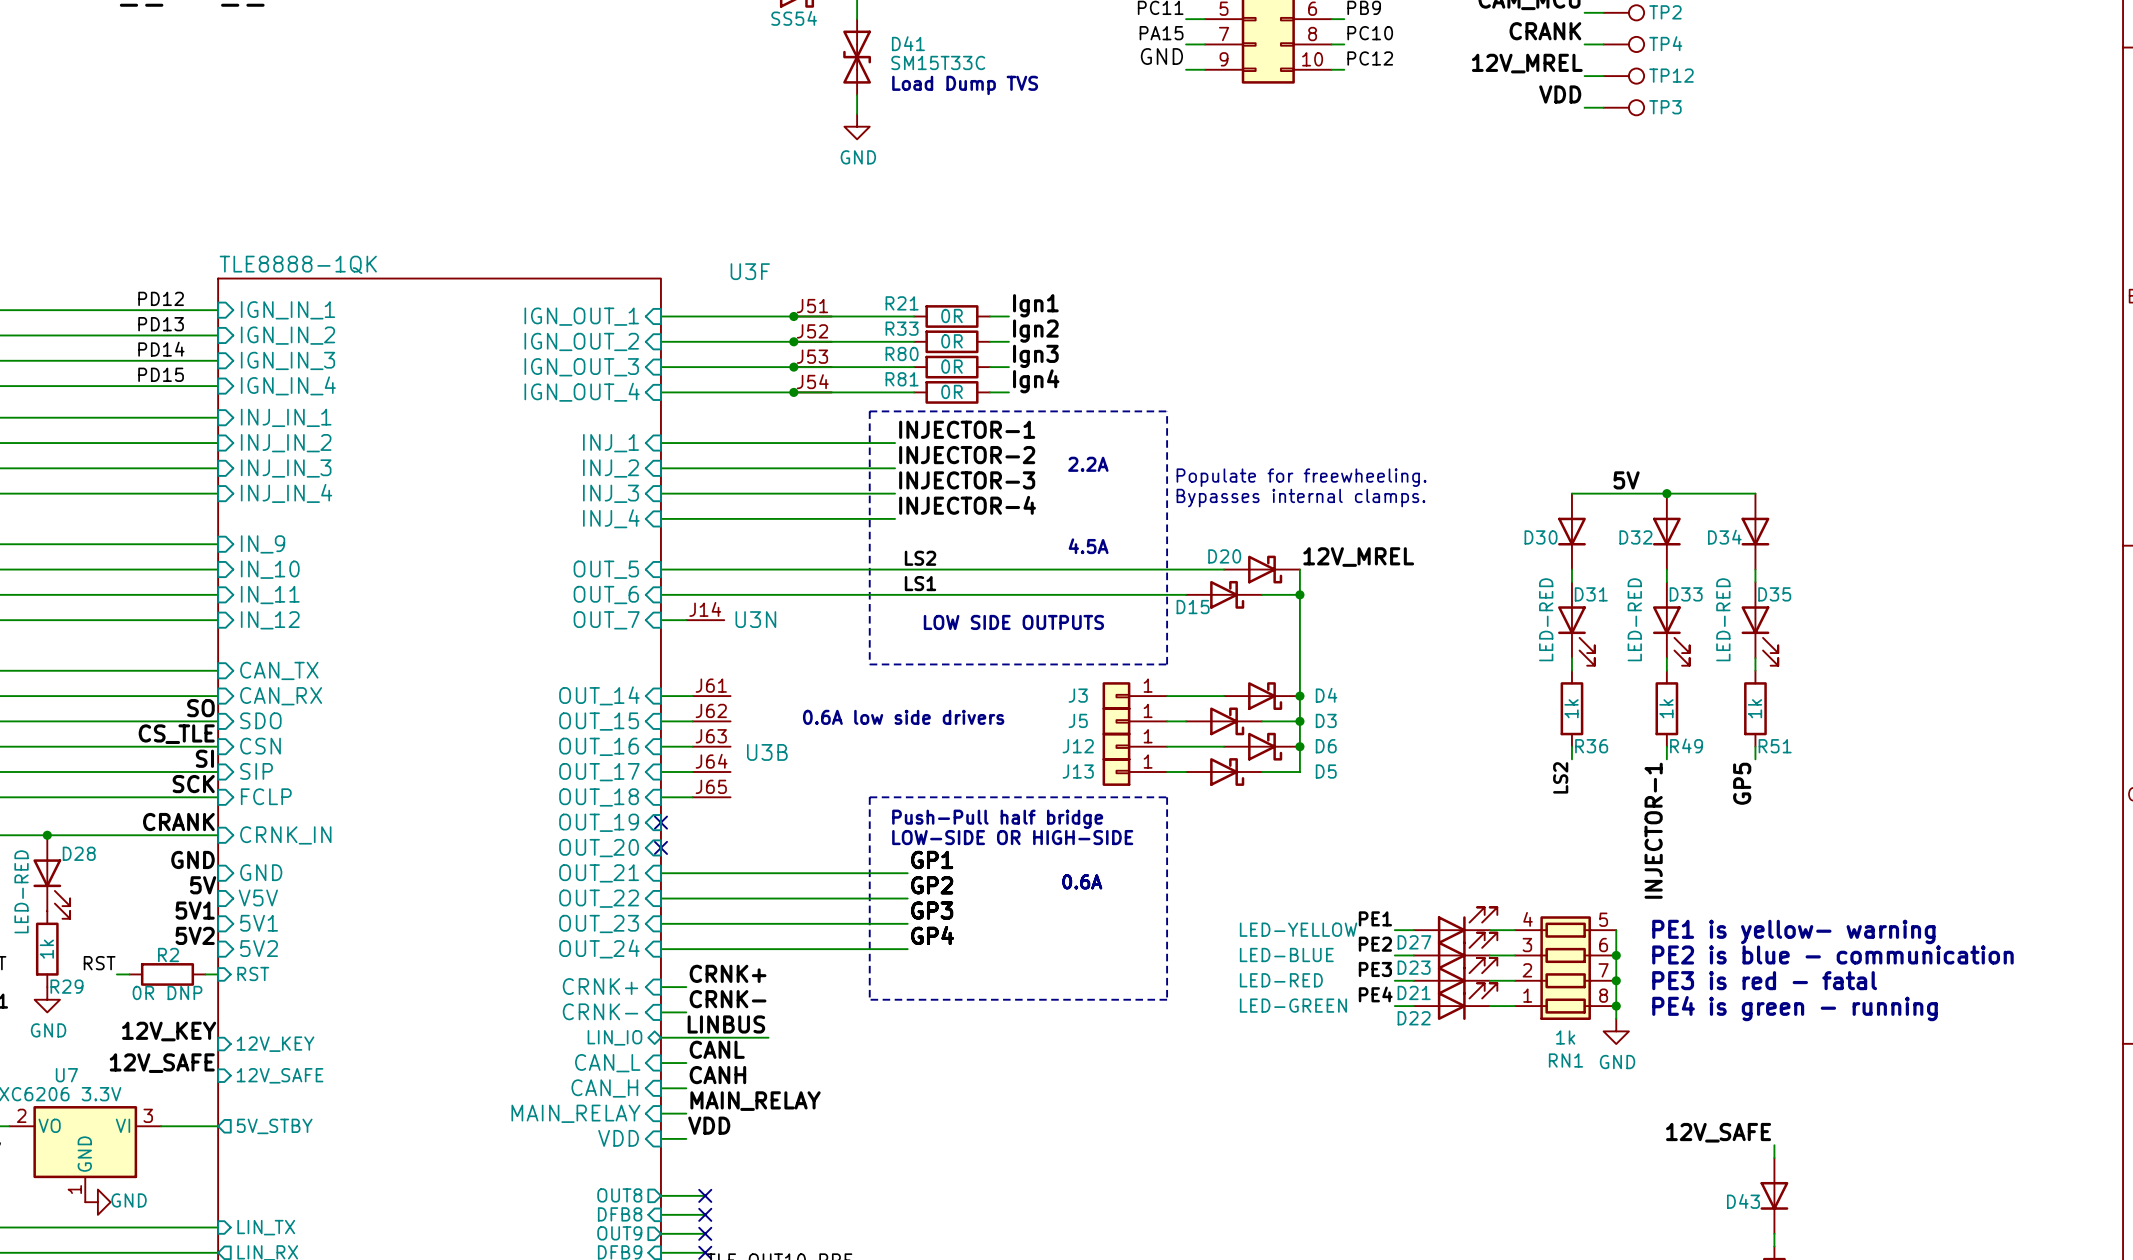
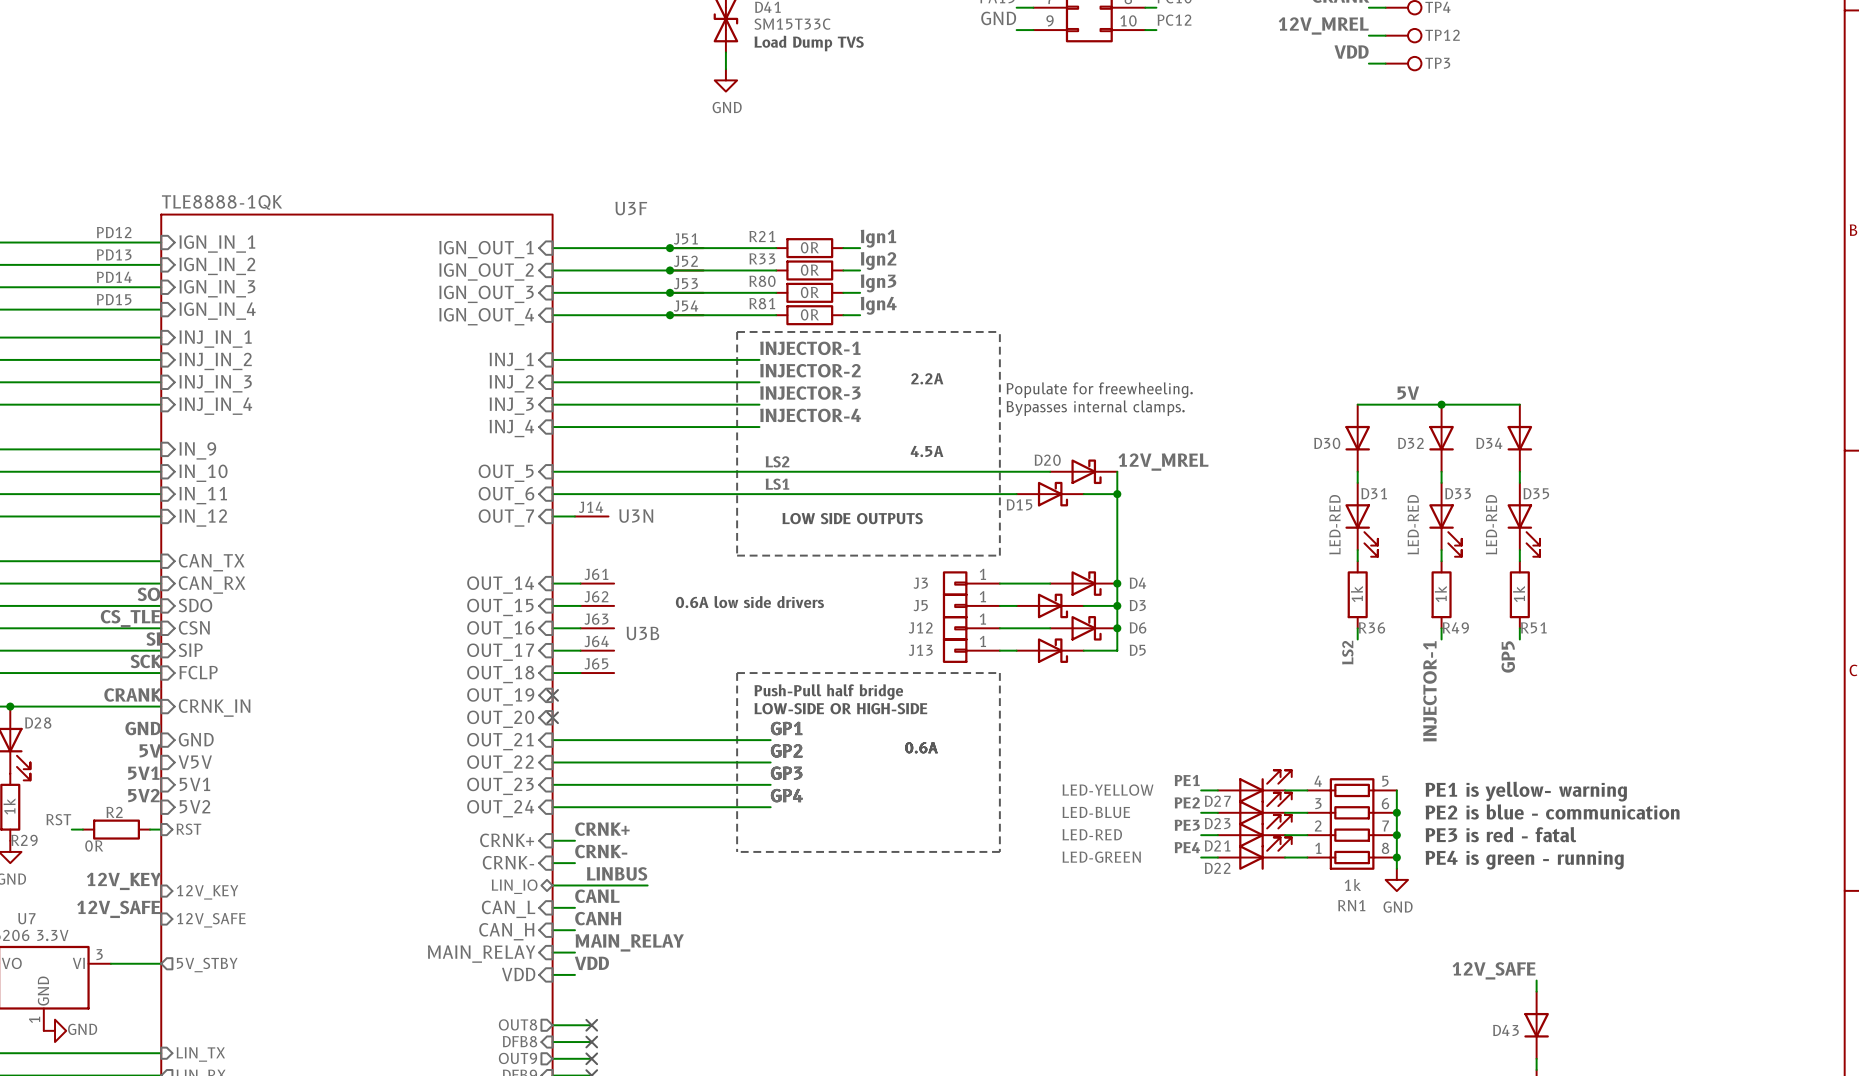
R2 value: 0R DNP (167, 992) -> 0R (94, 846)

